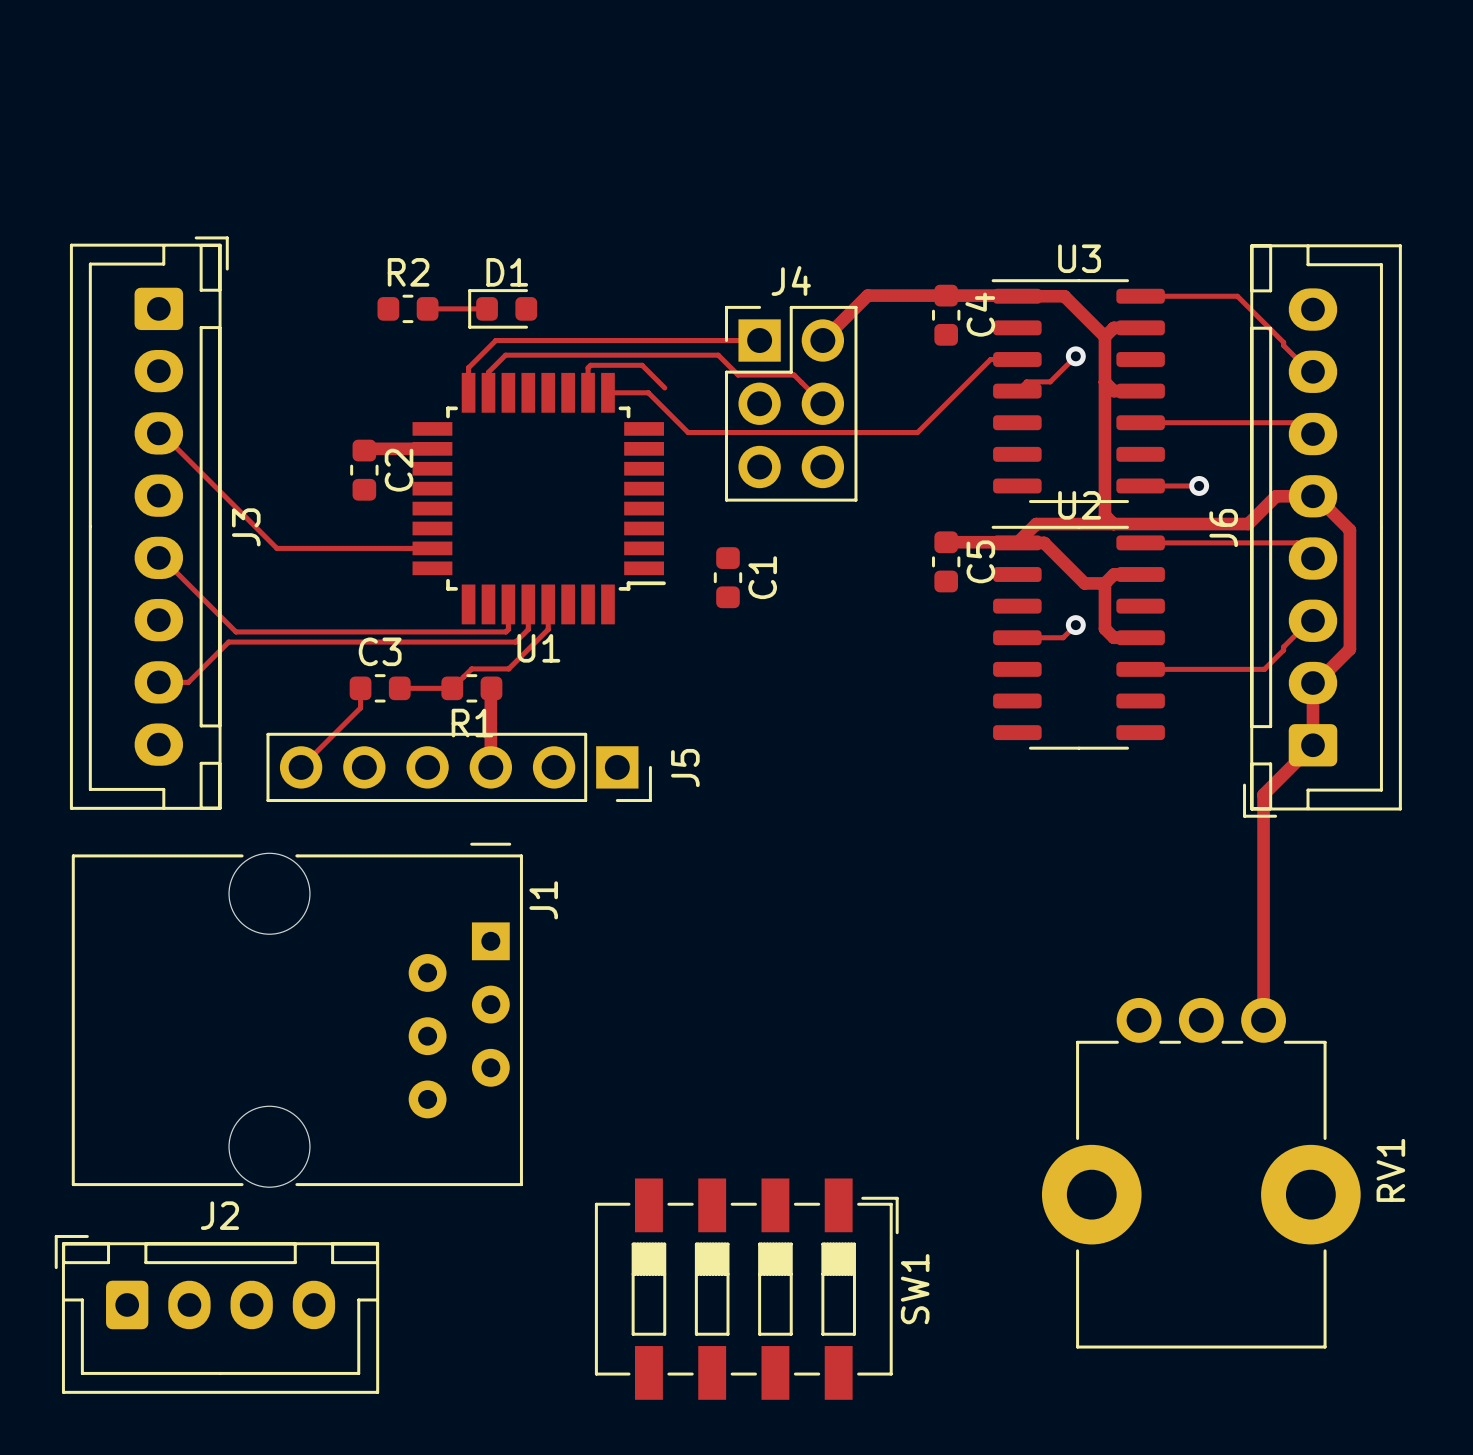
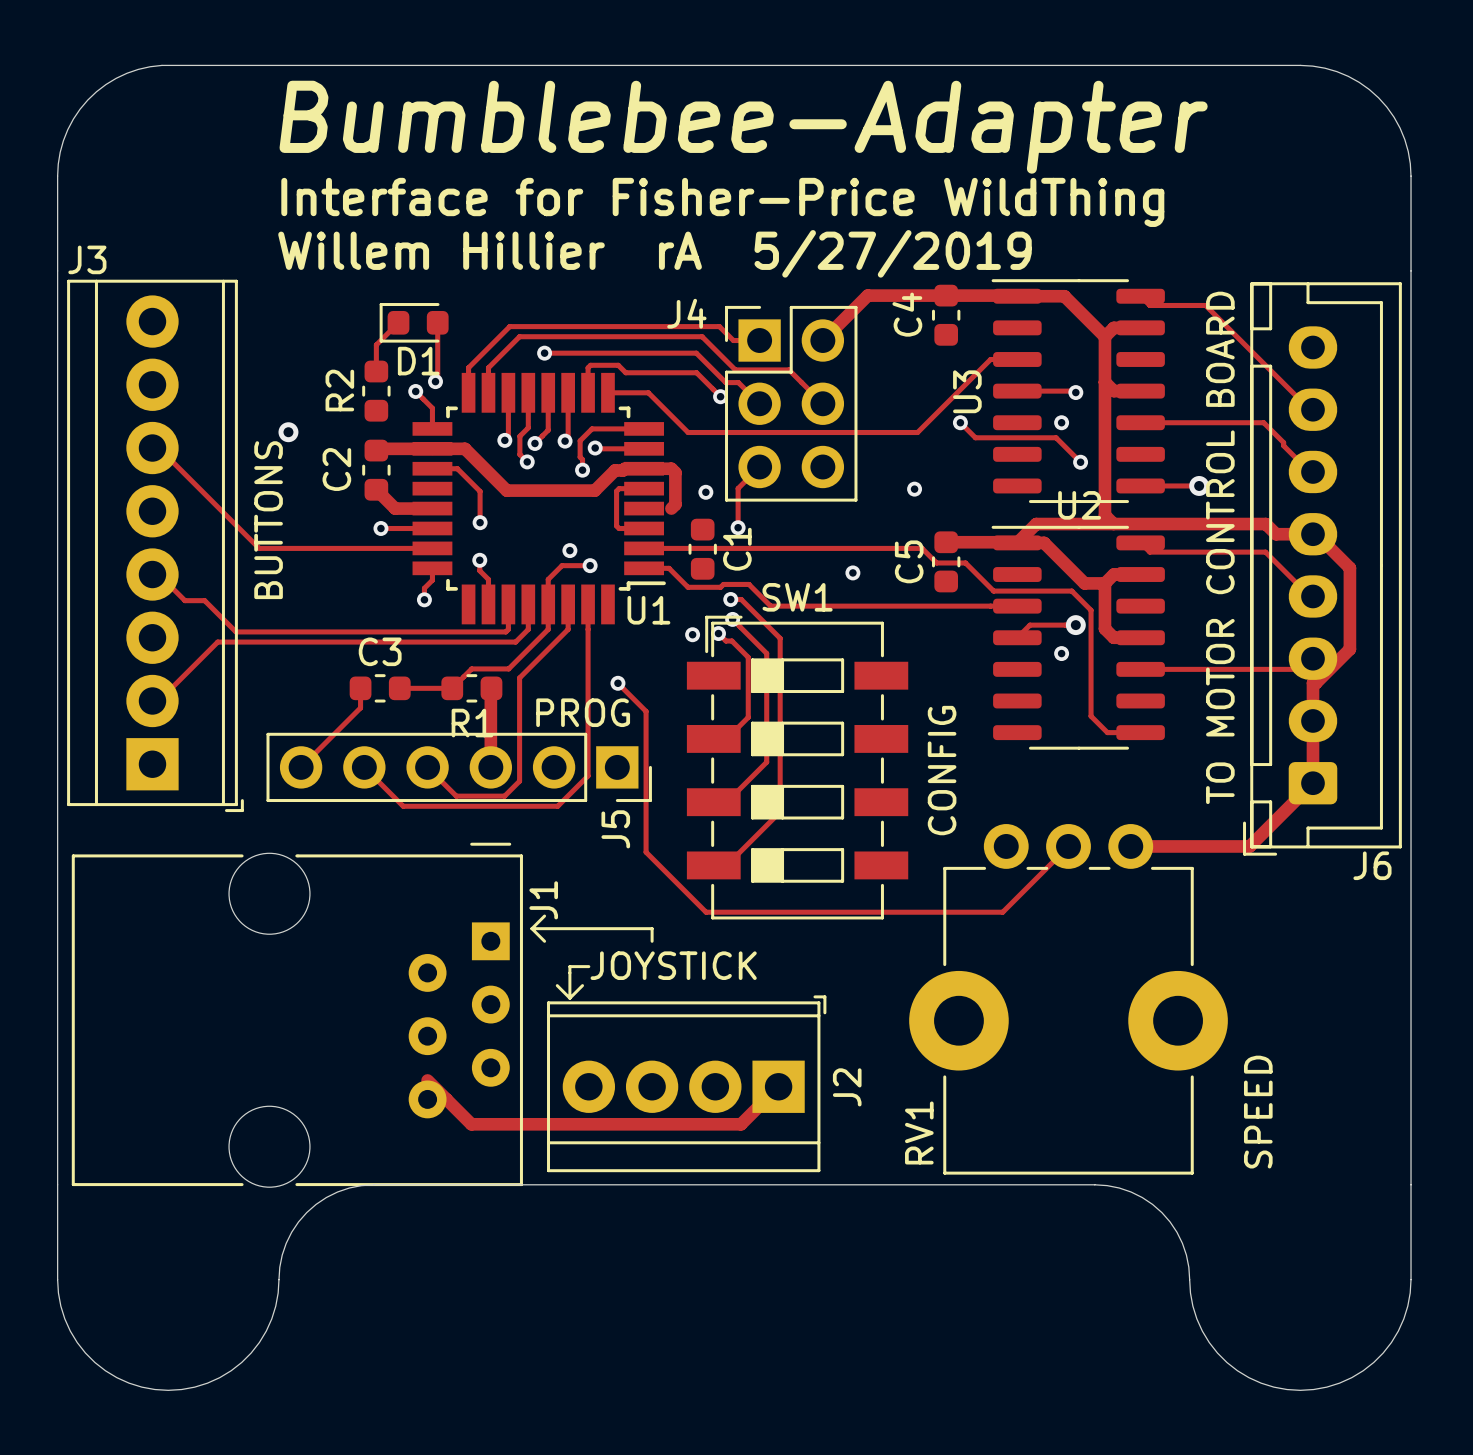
board edge: none -> (161, 65) (1300, 65) (1336, 71) (1359, 82) (1378, 97) (1400, 128) (1408, 151) (1411, 176) (1411, 1279) (1407, 1306) (1398, 1331) (1391, 1342) (1373, 1362) (1363, 1370) (1339, 1383) (1313, 1389) (1287, 1389) (1273, 1387) (1261, 1383) (1237, 1370) (1217, 1353) (1202, 1331) (1192, 1306) (1186, 1255) (1176, 1232) (1170, 1221) (1161, 1212) (1142, 1197) (1119, 1188) (1094, 1184) (361, 1185) (349, 1188) (326, 1197) (306, 1212) (298, 1221) (291, 1232) (282, 1255) (275, 1306) (266, 1331) (251, 1353) (231, 1370) (219, 1377) (194, 1387) (181, 1389) (154, 1389) (141, 1387) (116, 1377) (94, 1362) (85, 1353) (77, 1342) (64, 1318) (58, 1293) (57, 1279) (58, 164) (67, 129) (87, 100) (106, 84) (127, 73) (161, 65)
text: none -> Bumblebee-Adapter (743, 127)
text: none -> Interface for Fisher-Price WildThing (722, 202)
J3 footprint: [69, 236, 229, 810] -> [67, 279, 244, 813]
text: none -> Willem Hillier rA 5/27/2019 (654, 253)
U3 name rotation: 0° (1079, 258) -> 90° counterclockwise (967, 391)
U3 name position: U3 (1079, 258) -> U3 (967, 391)
R2 name position: R2 (408, 272) -> R2 (339, 390)
D1 name position: D1 (507, 272) -> D1 (418, 361)
J4 name position: J4 (791, 280) -> J4 (686, 313)
track: (1140, 296) (1237, 296) (1283, 342) (1283, 345) (1309, 371) (1312, 371) -> (1140, 296) (1149, 305) (1205, 305) (1309, 409) (1312, 409)
R2 rotation: 0° (407, 308) -> 90° clockwise (376, 391)
R2 position: (407, 308) -> (376, 391)
track: (427, 308) (487, 308) -> none
D1 position: (502, 308) -> (414, 322)
C4 name position: C4 (980, 314) -> C4 (907, 314)
track: none -> (398, 322) (376, 344) (376, 371)
track: none -> (437, 322) (437, 379) (435, 381)
track: (495, 340) (733, 340) -> (495, 340) (509, 326) (719, 326) (733, 340)
track: none -> (544, 353) (696, 353) (725, 382) (738, 382) (759, 403)
via: none -> (544, 353)
track: (1075, 356) (1050, 381) (1026, 381) (1017, 391) -> (1075, 392) (1017, 391)
via: (1075, 356) -> none
track: (618, 365) (642, 365) (664, 387) -> (618, 365) (625, 372) (696, 372) (720, 396)
track: (488, 372) (505, 355) (718, 355) (738, 375) (794, 375) -> (488, 372) (488, 367) (519, 336) (702, 336) (735, 369) (789, 369) (794, 375)
via: none -> (435, 381)
track: none -> (415, 391) (432, 408) (432, 428)
via: none -> (415, 391)
track: none -> (508, 392) (508, 436) (504, 440)
track: none -> (528, 392) (528, 427) (519, 436) (519, 454) (527, 461)
track: none -> (548, 392) (548, 430) (534, 443)
track: none -> (568, 392) (568, 438) (565, 441)
via: none -> (1075, 392)
via: none -> (720, 396)
track: none -> (960, 422) (975, 437) (1056, 437) (1080, 462)
via: none -> (960, 422)
via: none -> (1061, 422)
track: (1263, 422) (1301, 422) (1312, 434) -> (1263, 422) (1283, 442) (1283, 445) (1309, 471) (1312, 471)
track: none -> (644, 428) (592, 428) (580, 440) (582, 470)
via: none -> (288, 432)
track: (158, 433) (161, 433) (276, 548) -> (158, 448) (259, 548) (276, 548)
via: none -> (504, 440)
via: none -> (565, 441)
via: none -> (534, 443)
track: none -> (432, 448) (465, 448) (506, 490) (594, 490) (615, 470) (671, 468) (675, 472) (675, 504) (671, 508)
track: none -> (595, 448) (644, 448)
via: none -> (595, 448)
via: none -> (527, 461)
via: none -> (1080, 462)
track: none -> (759, 467) (738, 488) (738, 527)
track: none -> (432, 468) (457, 468) (480, 491) (480, 522)
C2 position: (364, 470) -> (376, 470)
C2 name position: C2 (399, 470) -> C2 (336, 469)
via: none -> (582, 470)
track: none -> (644, 488) (619, 488) (616, 491) (616, 525) (619, 528) (644, 528)
track: none -> (376, 489) (395, 508) (432, 508)
via: none -> (914, 489)
via: none -> (705, 492)
text: none -> BUTTONS (268, 520)
via: none -> (480, 522)
track: (1248, 524) (1276, 496) (1316, 496) (1349, 530) (1349, 568) -> (1248, 524) (1265, 524) (1276, 534) (1316, 534) (1349, 568)
J3 name position: J3 (246, 527) -> J3 (87, 259)
via: none -> (738, 527)
J6 name rotation: 0° (1223, 527) -> 90° clockwise (1372, 865)
J6 name position: J6 (1223, 527) -> J6 (1372, 865)
track: none -> (380, 528) (432, 528)
via: none -> (380, 528)
J6 position: (1322, 531) -> (1322, 568)
track: (1140, 542) (1297, 542) (1312, 558) -> (1140, 542) (1149, 552) (1265, 552) (1309, 596) (1312, 596)
text: none -> TO MOTOR CONTROL BOARD (1220, 547)
track: none -> (644, 548) (922, 548) (936, 562) (965, 562) (993, 591) (1071, 591) (1091, 610) (1091, 716) (1107, 732) (1140, 732)
via: none -> (569, 550)
track: (158, 557) (161, 557) (204, 600) -> (158, 574) (184, 600) (204, 600)
track: none -> (479, 560) (479, 570) (488, 579) (488, 604)
via: none -> (479, 560)
C5 name position: C5 (980, 561) -> C5 (909, 561)
track: none -> (590, 565) (562, 565) (548, 579) (548, 604)
via: none -> (590, 565)
track: none -> (432, 568) (432, 580) (424, 588) (424, 599)
track: none -> (644, 568) (669, 568) (688, 587) (720, 587) (723, 584) (748, 584) (770, 606) (1017, 606)
via: none -> (852, 572)
C1 position: (728, 577) -> (702, 549)
via: none -> (424, 599)
track: none -> (730, 599) (741, 599) (780, 638) (780, 811) (726, 865) (713, 865)
via: none -> (730, 599)
track: none -> (568, 604) (568, 629) (519, 677) (519, 781) (504, 796) (456, 796) (427, 767)
track: none -> (588, 604) (588, 775) (557, 806) (403, 806) (364, 767)
track: none -> (732, 619) (766, 653) (766, 762) (726, 802) (713, 802)
via: none -> (732, 619)
track: (1312, 620) (1309, 620) (1283, 646) (1283, 650) (1264, 669) -> (1312, 658) (1302, 669) (1264, 669)
track: (1075, 625) (1063, 637) (1017, 637) -> (1075, 625) (1030, 625) (1017, 637)
track: none -> (718, 633) (725, 641) (731, 641) (748, 657) (748, 717) (726, 738) (713, 738)
via: none -> (718, 633)
via: none -> (692, 634)
track: (228, 642) (188, 682) (158, 682) -> (228, 642) (217, 642) (158, 700)
U1 name position: U1 (538, 648) -> U1 (648, 610)
via: none -> (1061, 653)
track: none -> (617, 683) (646, 711) (646, 852) (706, 912) (1002, 912) (1068, 846)
via: none -> (617, 683)
text: none -> PROG (583, 712)
track: (1312, 745) (1263, 794) (1263, 1020) -> (1312, 745) (1312, 783) (1249, 846) (1130, 846)
J5 name position: J5 (685, 767) -> J5 (615, 829)
text: none -> CONFIG (942, 770)
line: none -> (544, 916) (531, 928)
line: none -> (531, 928) (544, 941)
line: none -> (531, 928) (652, 928) (652, 941)
text: none -> JOYSTICK (673, 965)
line: none -> (588, 966) (569, 966) (569, 998)
line: none -> (557, 985) (569, 998)
line: none -> (582, 985) (569, 998)
track: none -> (427, 1080) (471, 1124) (741, 1124) (778, 1086)
text: none -> SPEED (1258, 1112)
RV1 name position: RV1 (1390, 1170) -> RV1 (919, 1132)
RV1 position: (1201, 1173) -> (1068, 999)
J2 name position: J2 (219, 1215) -> J2 (847, 1087)
J2 footprint: [54, 1234, 380, 1394] -> [547, 995, 827, 1173]
SW1 rotation: 0° (746, 1289) -> 90° counterclockwise (797, 767)
SW1 position: (746, 1289) -> (797, 767)

